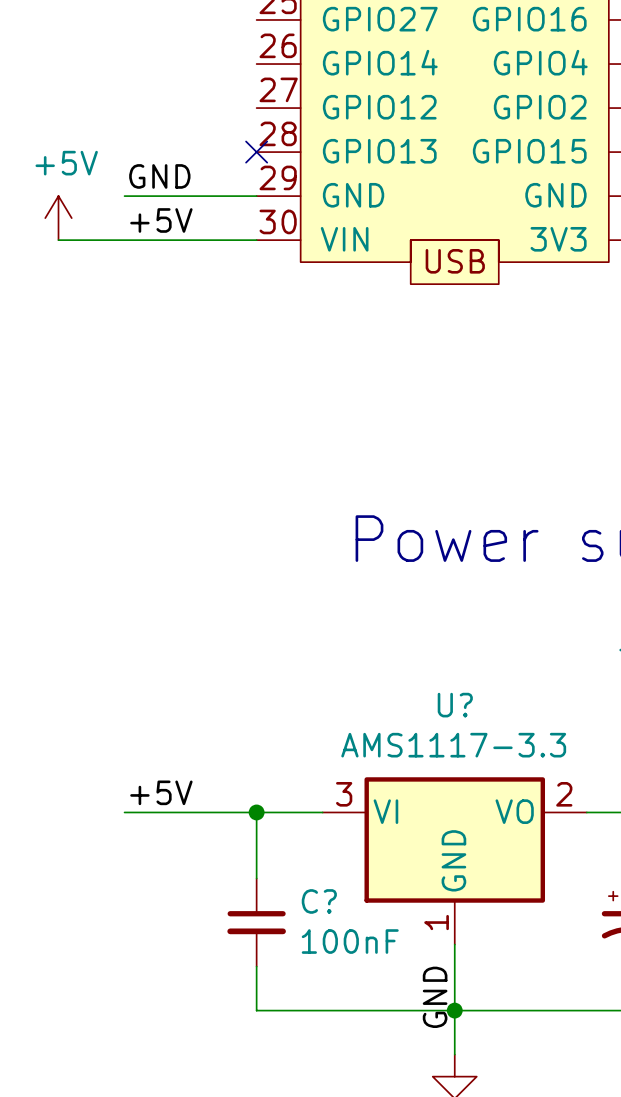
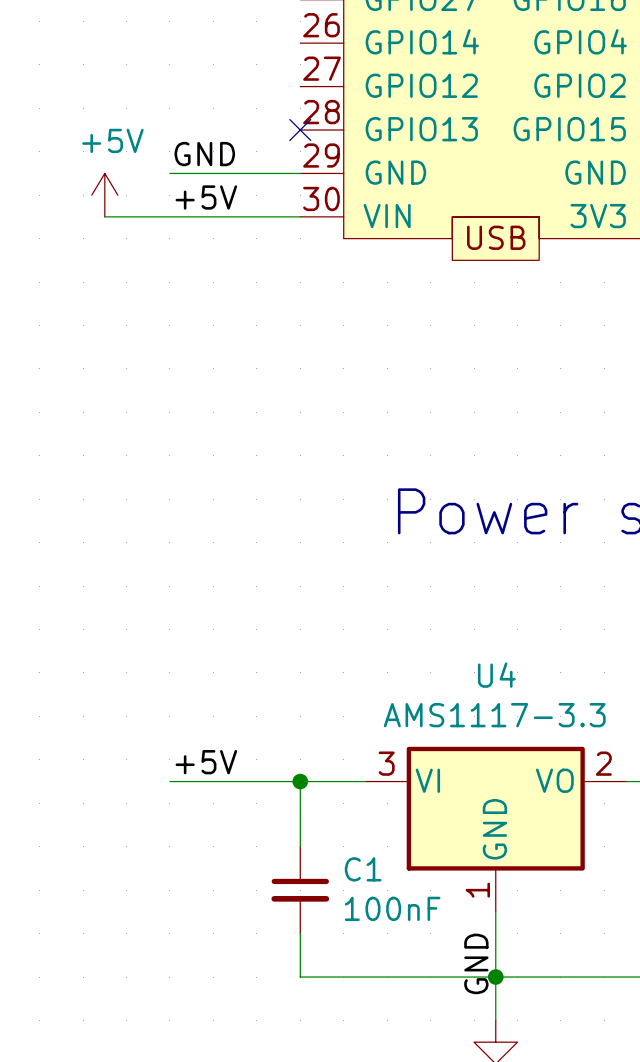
U? name: U? (455, 705) -> U4 (496, 675)
C? name: C? (319, 901) -> C1 (363, 869)

